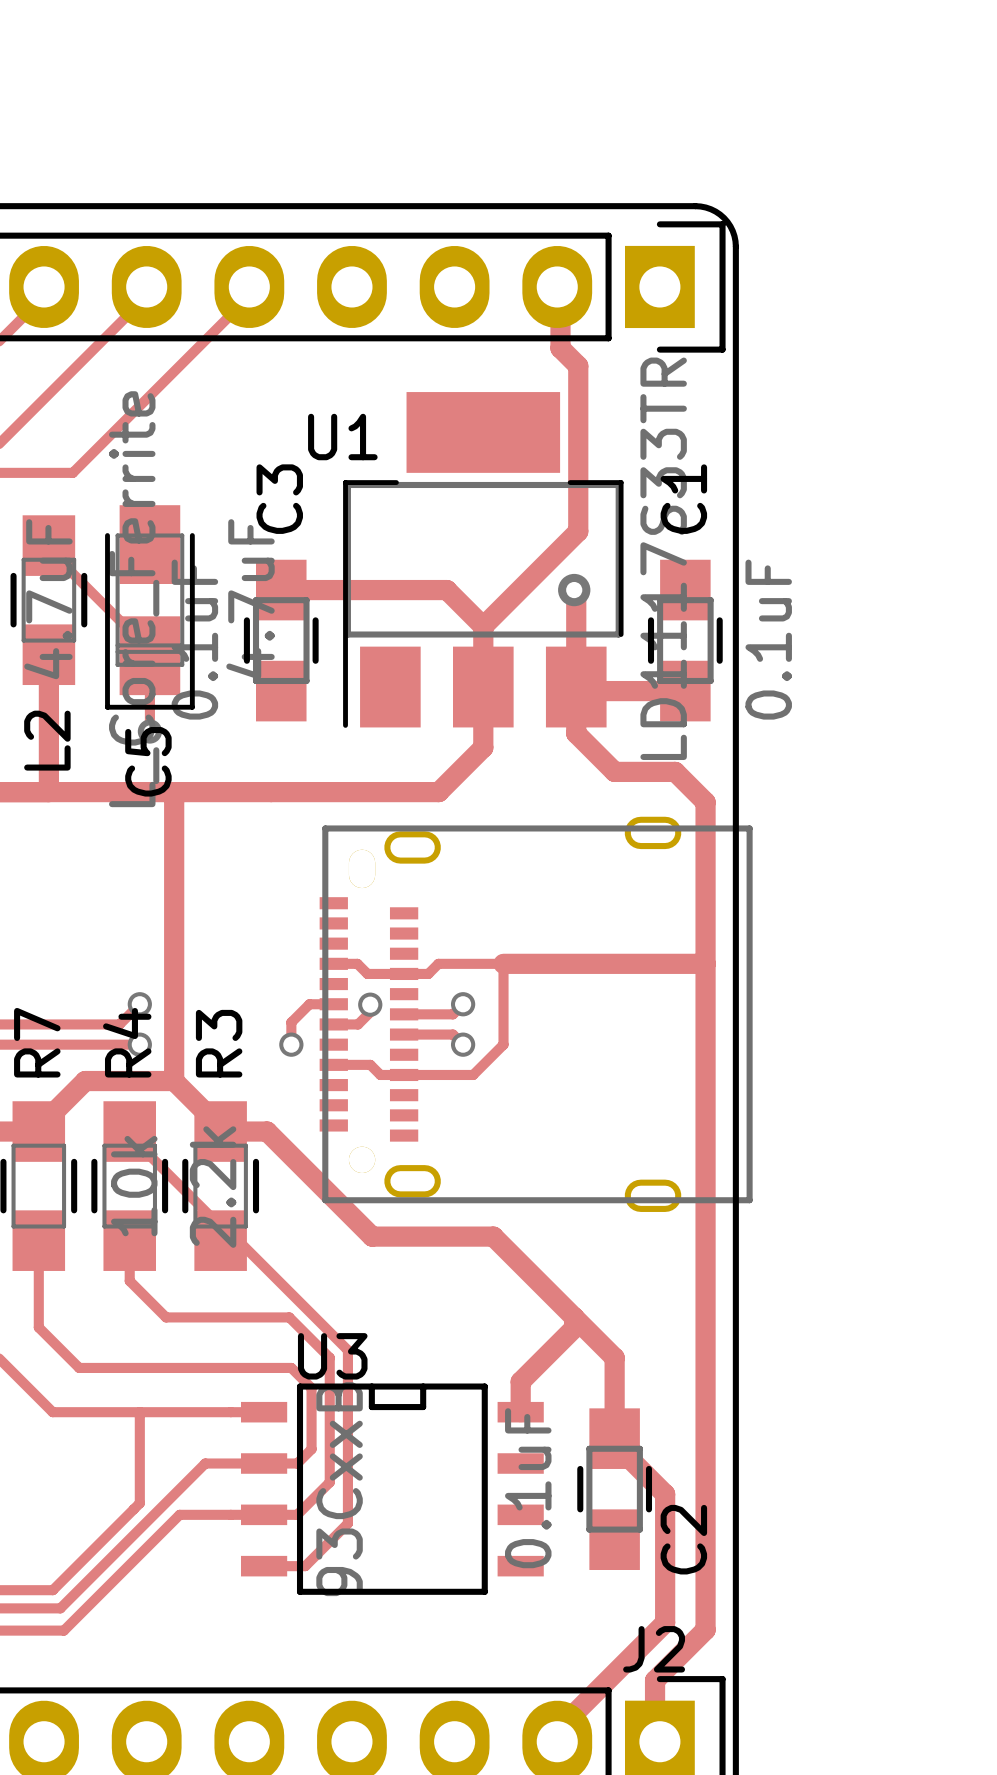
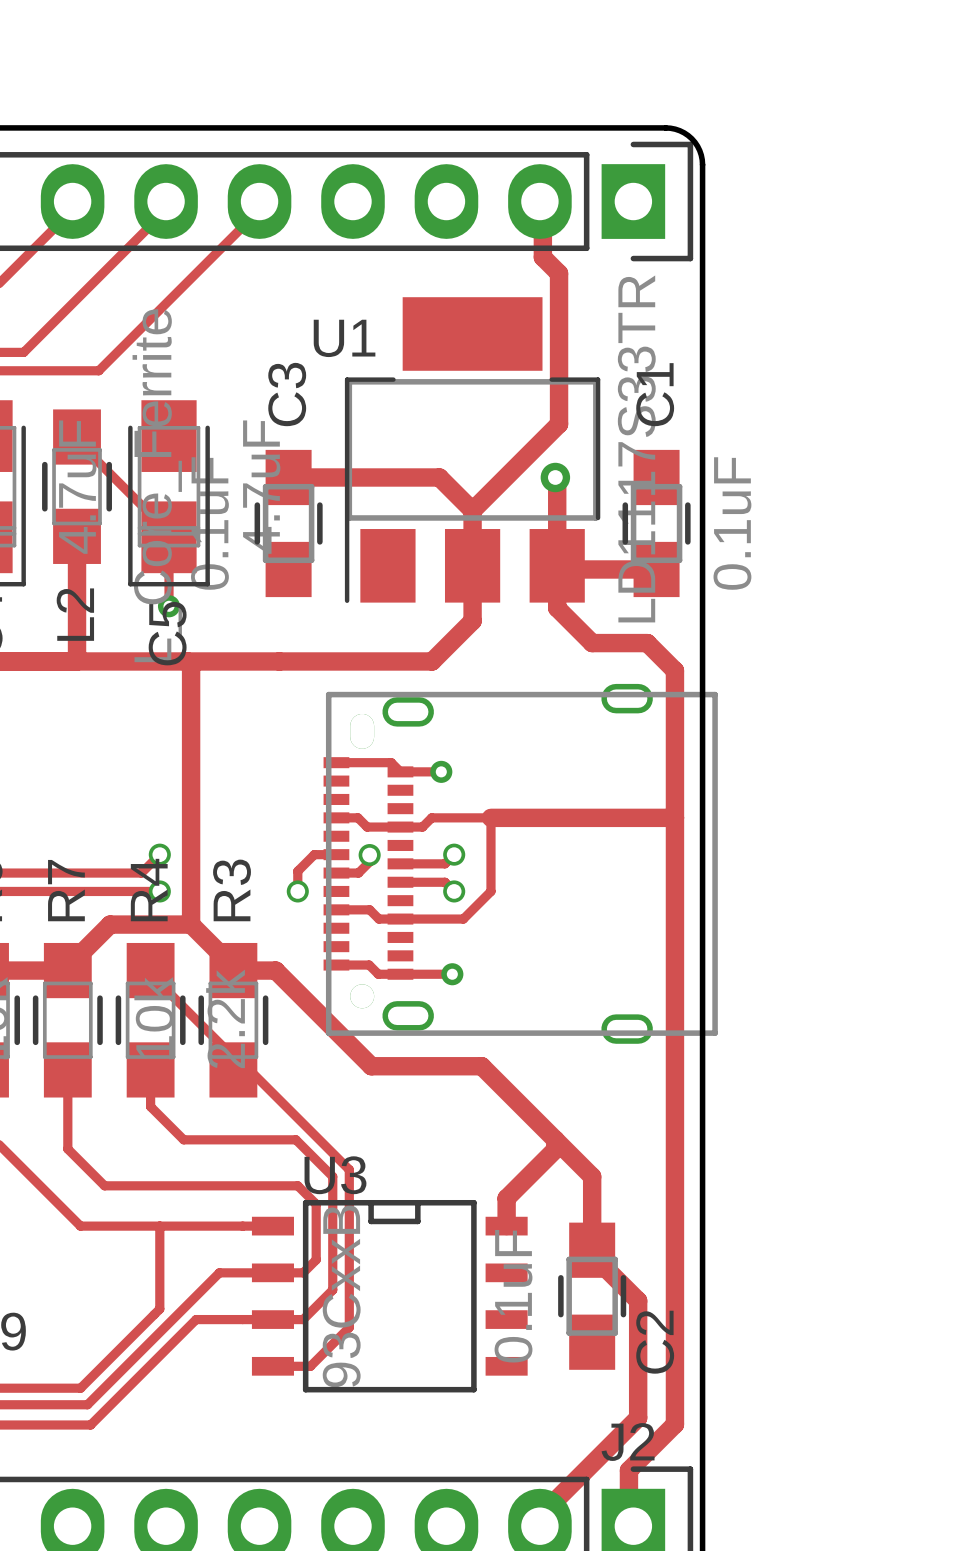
track: none -> (336, 762) (391, 762) (400, 771) (441, 771)
via: none -> (441, 771)
track: none -> (336, 965) (369, 965) (378, 974) (452, 974)
via: none -> (452, 974)

